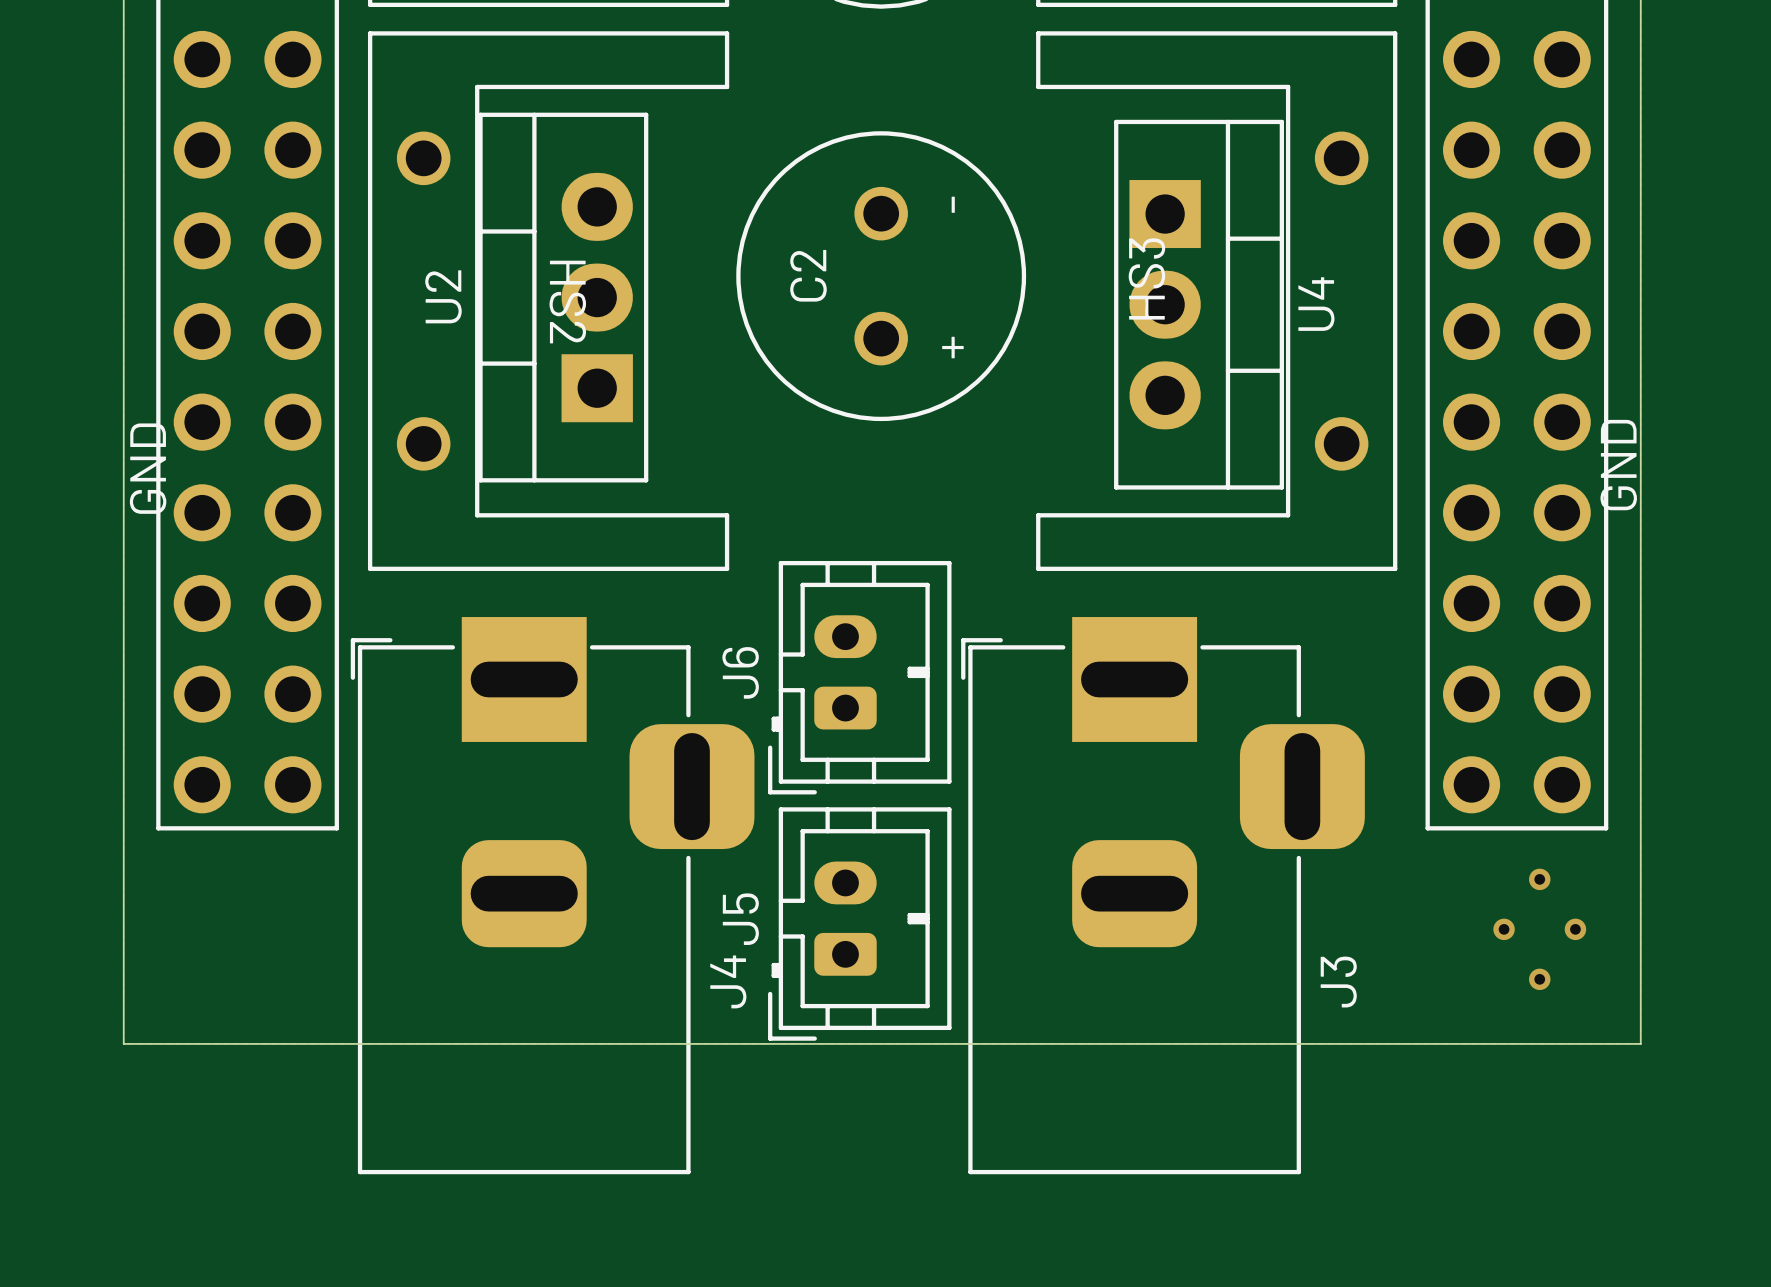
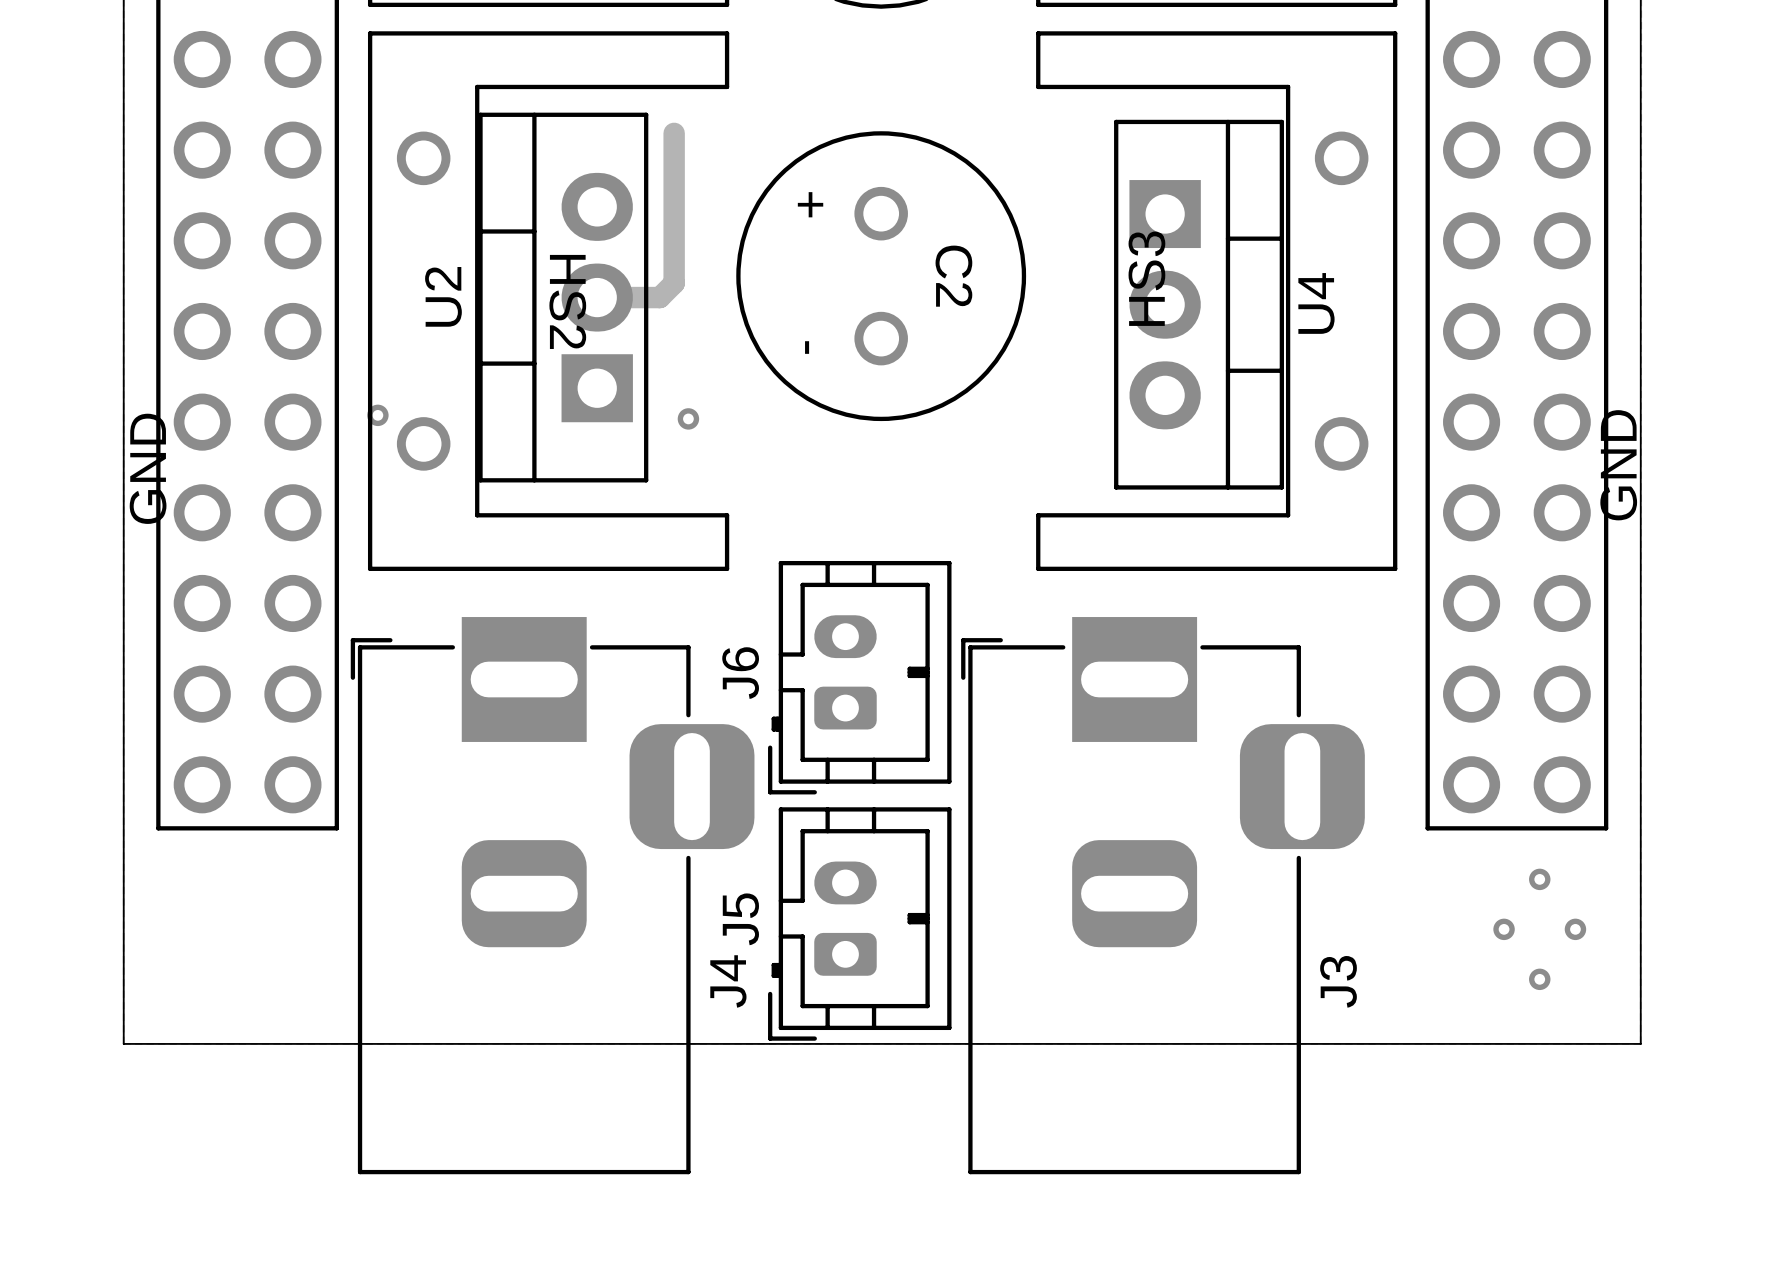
track: none -> (674, 133) (674, 283) (659, 297) (597, 297)
C2 rotation: 0° (881, 276) -> 180° (881, 276)
via: none -> (377, 415)
via: none -> (688, 418)

